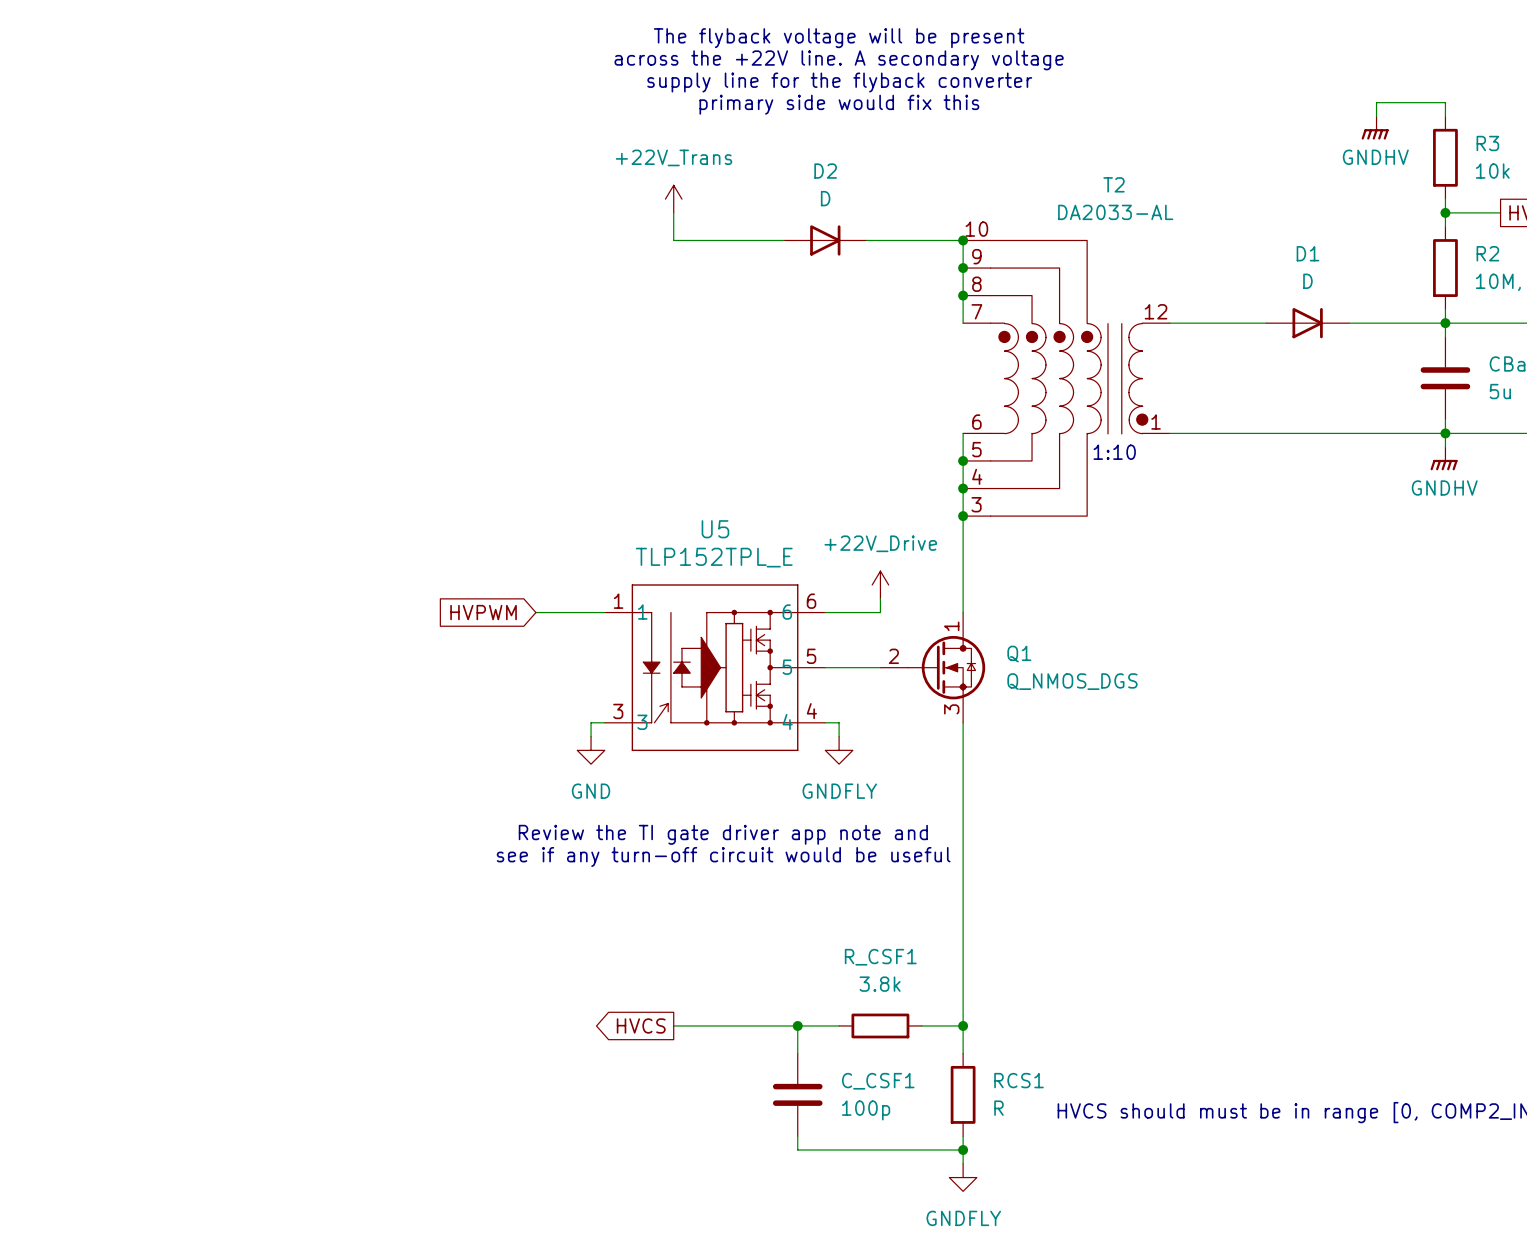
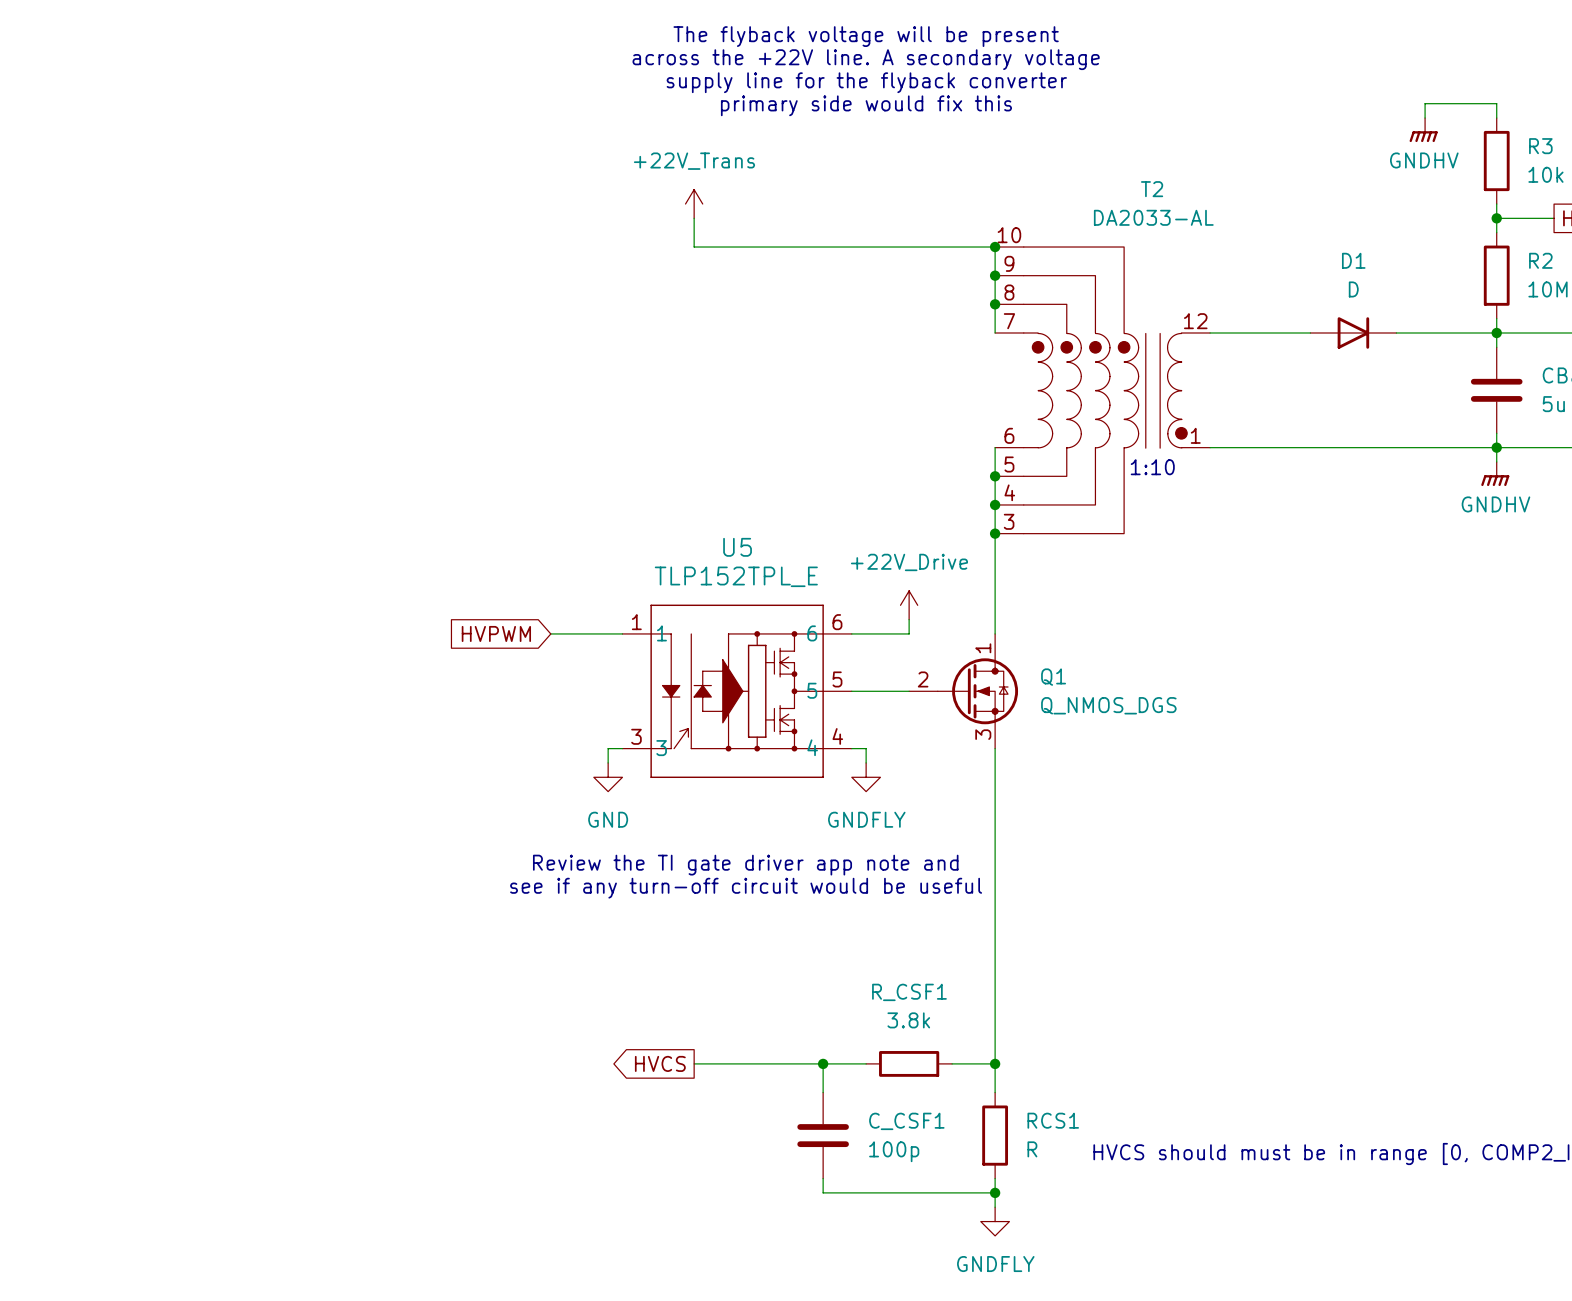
D2: D (825, 240) -> none

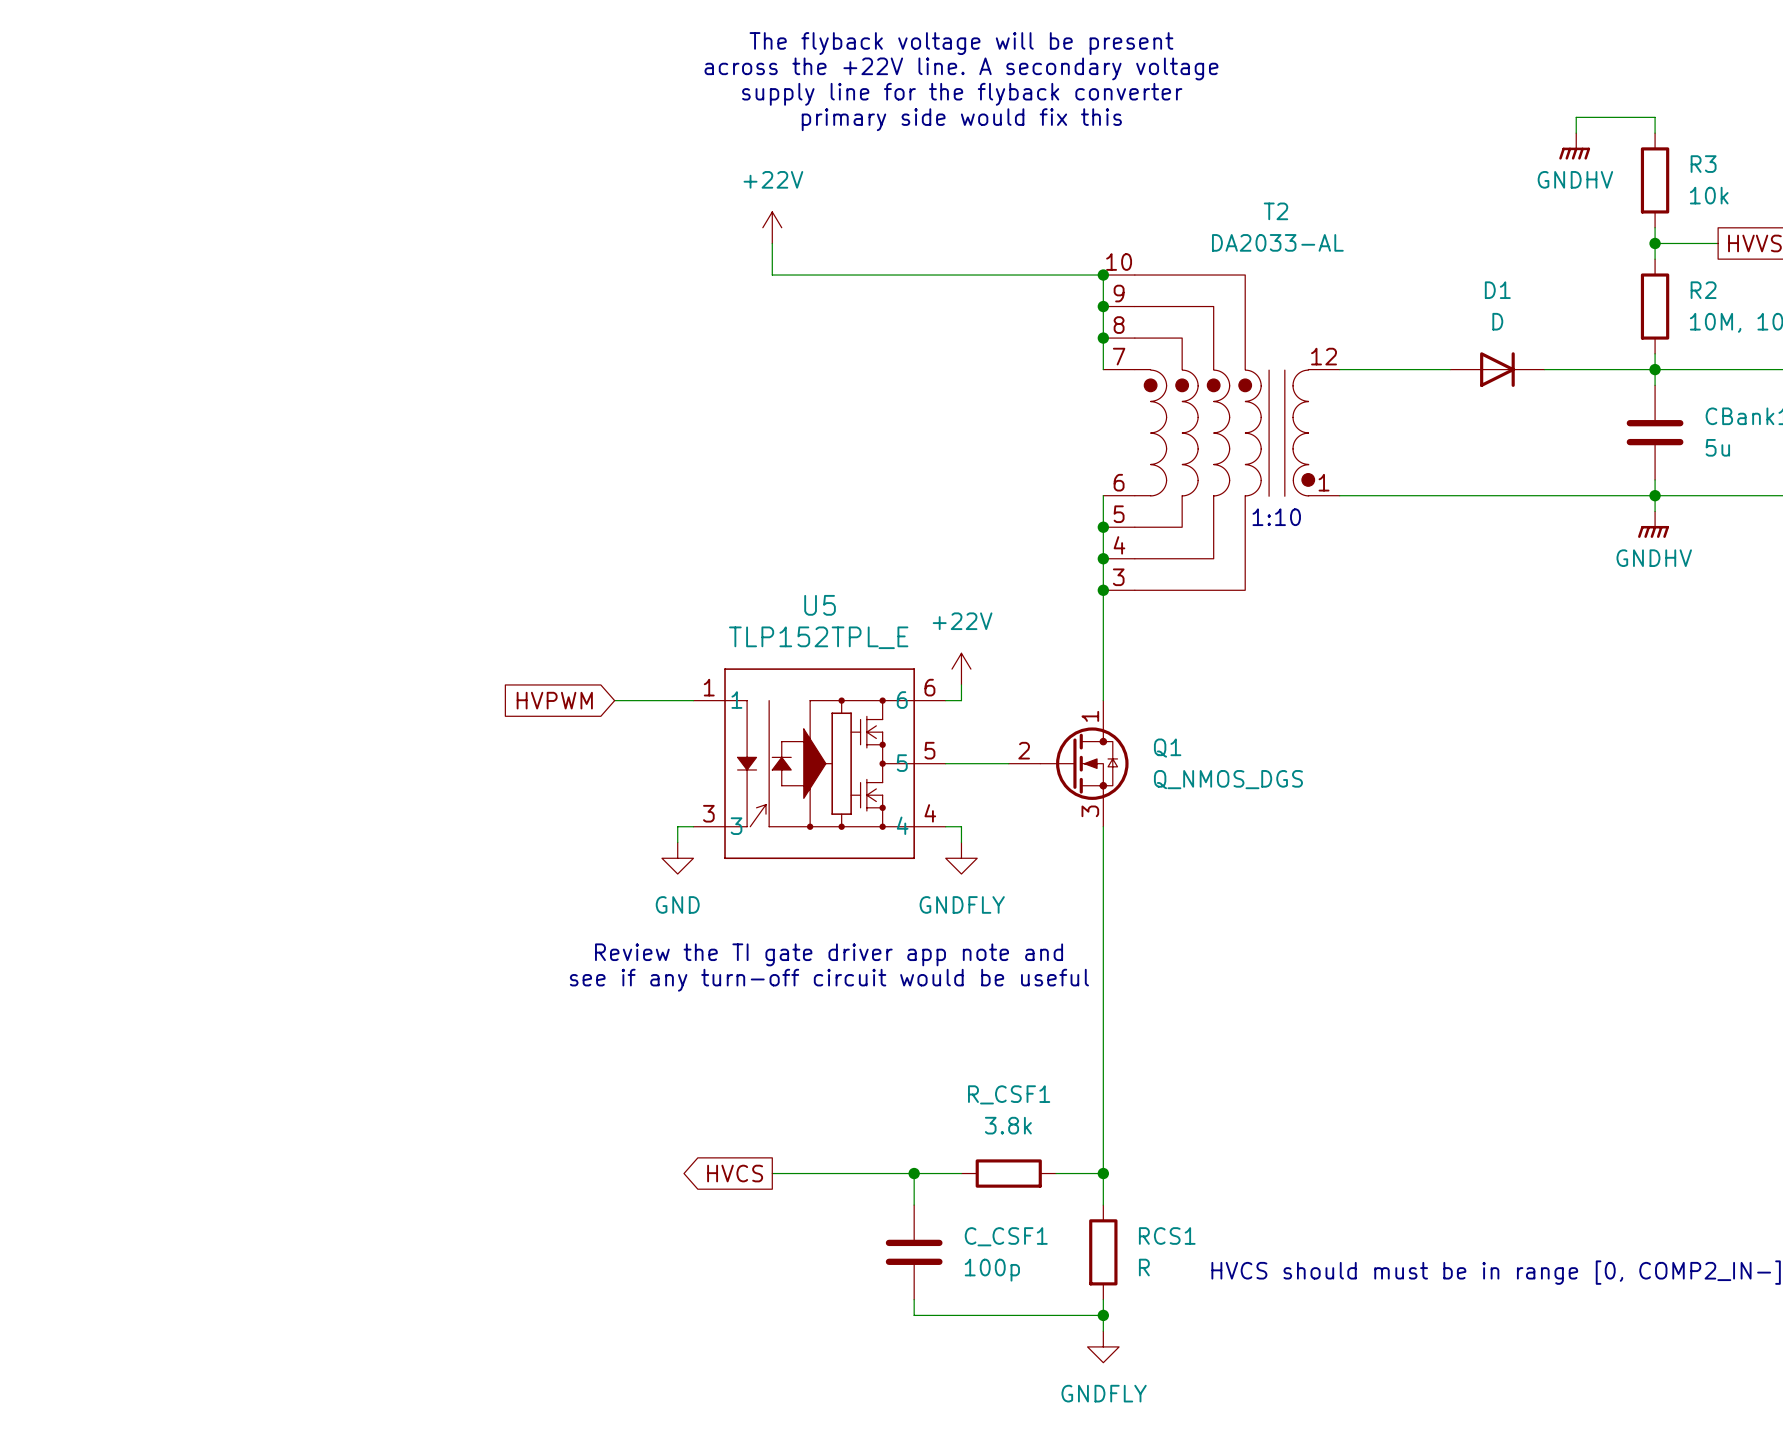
power symbol: +22V_Trans (694, 204) -> +22V (772, 227)
power symbol: none -> +22V (961, 669)
power symbol: +22V_Drive (909, 605) -> none
wire: (909, 619) (909, 633) (866, 633) -> (961, 684) (961, 700)

